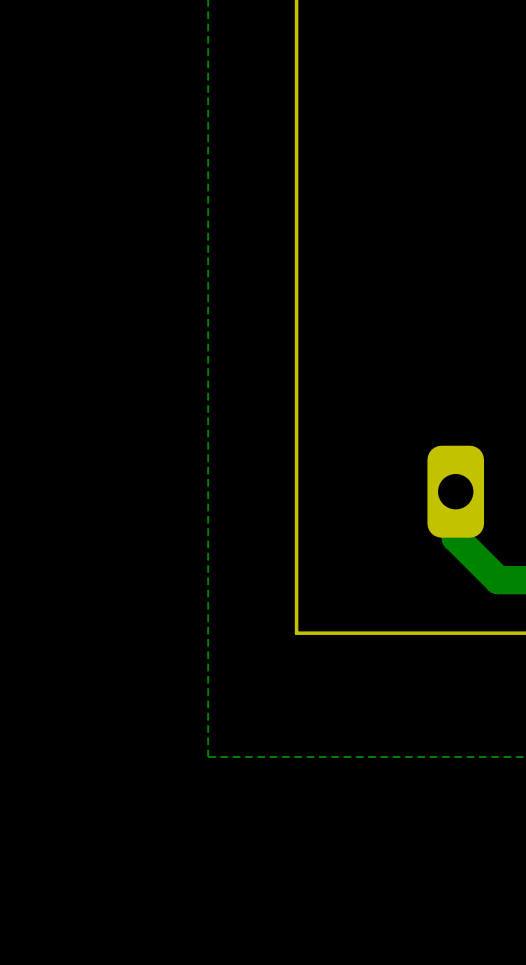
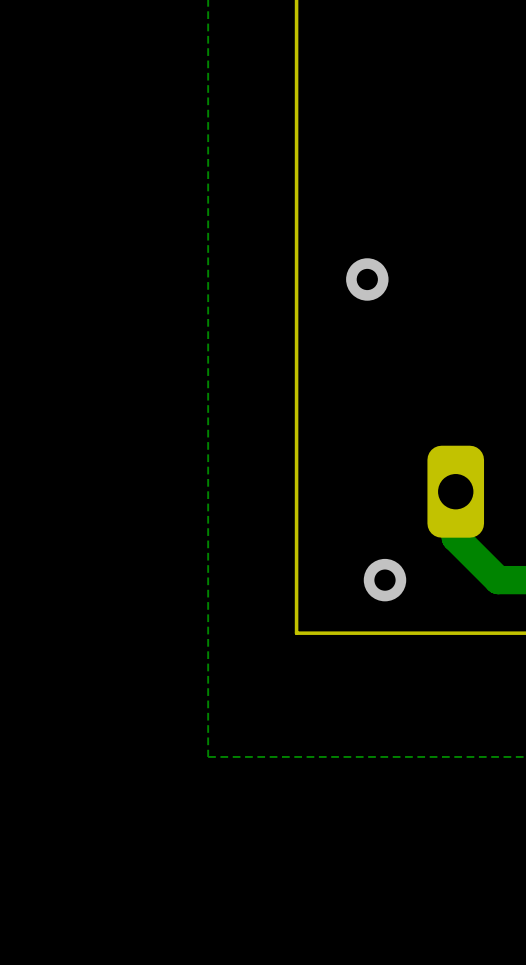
via: none -> (367, 279)
via: none -> (384, 580)

